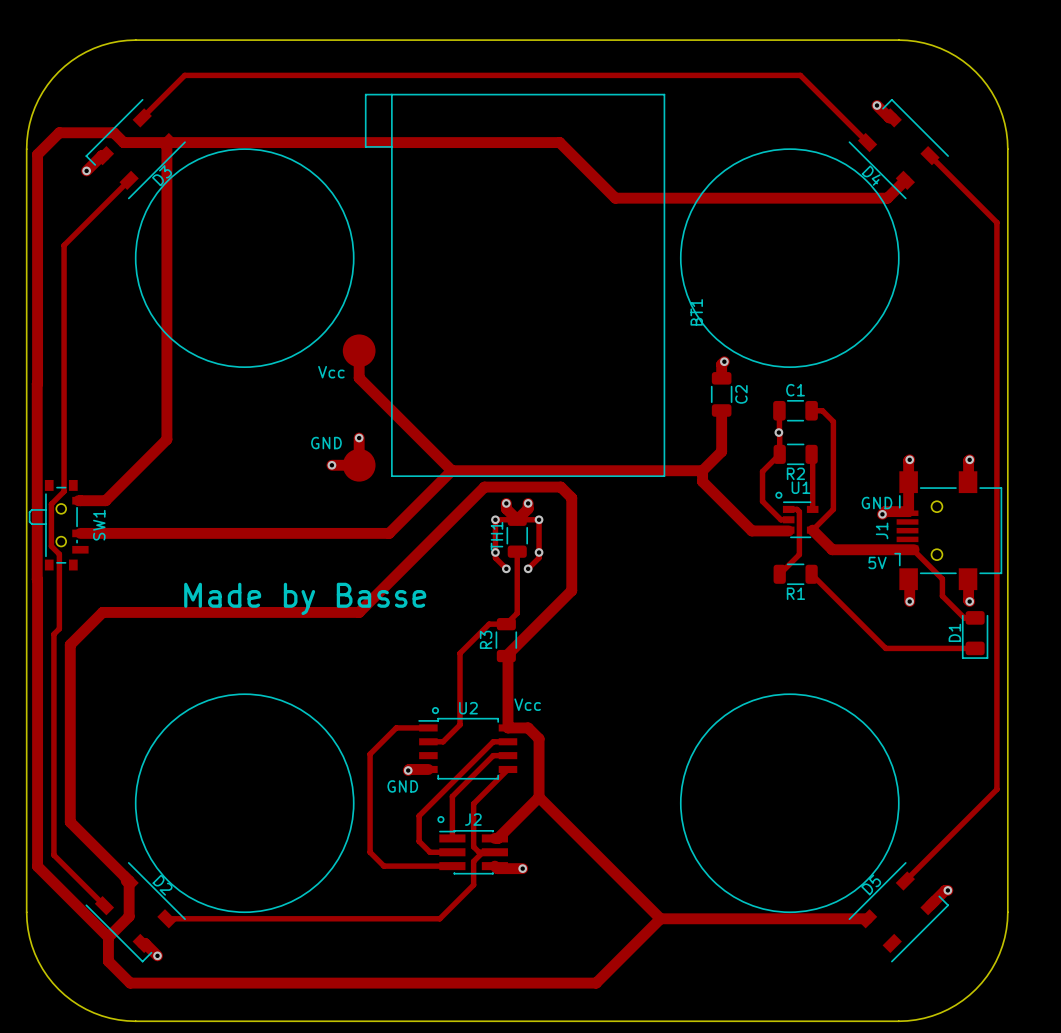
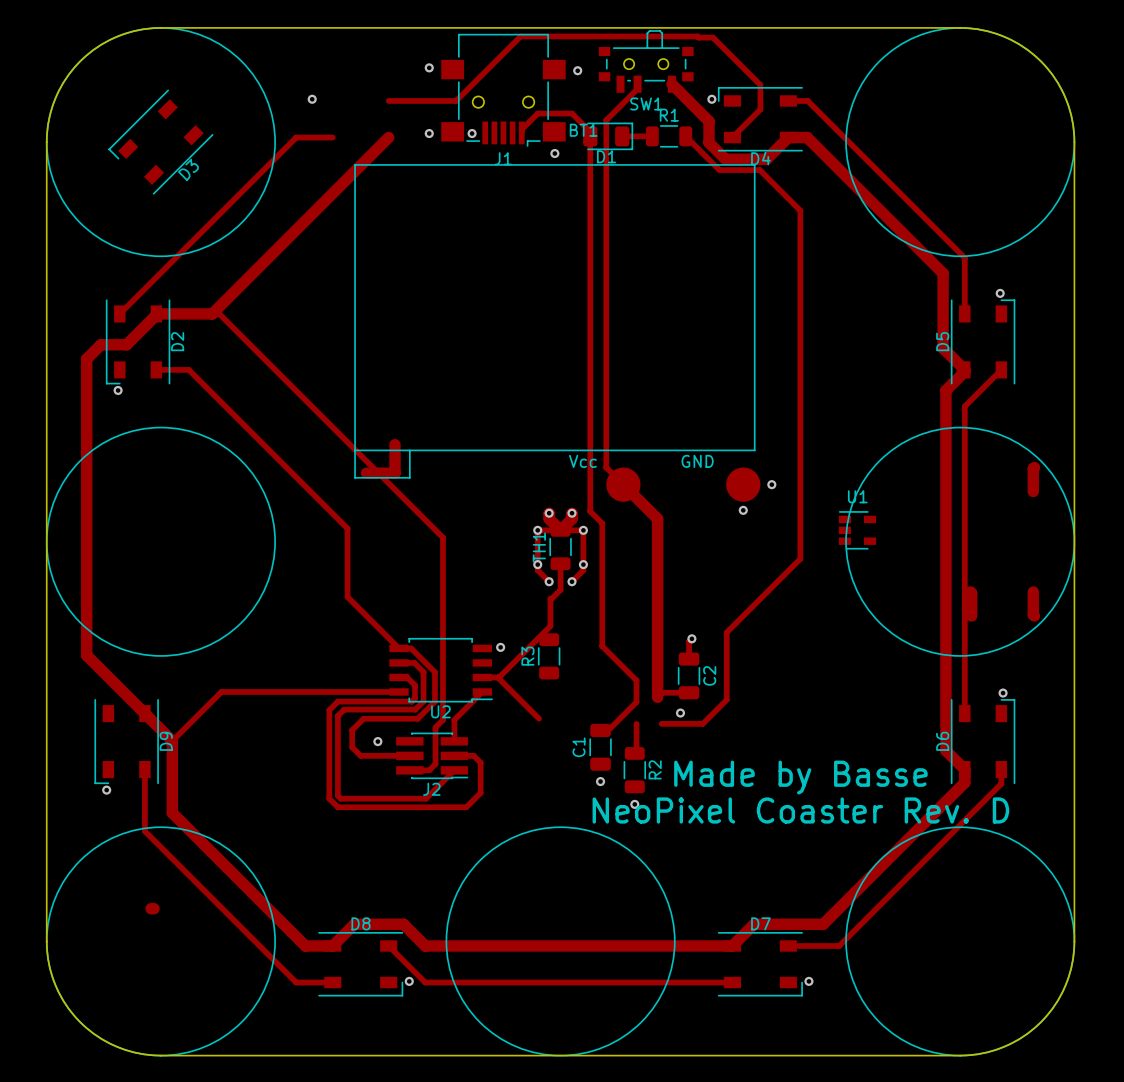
drawing: none -> [46, 27, 276, 257]
drawing: none -> [845, 27, 1076, 257]
via: none -> (429, 67)
via: none -> (577, 70)
track: none -> (637, 84) (637, 88) (606, 120) (606, 467) (657, 518) (657, 697) (662, 692) (689, 692)
track: none -> (671, 84) (709, 121) (709, 142) (725, 159) (766, 159) (788, 137) (807, 137) (943, 273) (943, 348) (964, 369) (945, 390) (945, 750) (964, 769) (964, 782) (823, 924) (754, 924) (732, 945) (425, 945) (403, 924) (354, 924) (332, 945) (305, 945) (172, 812) (172, 741)
track: (877, 105) (889, 117) (892, 117) -> none
via: (877, 105) -> none
via: none -> (312, 99)
via: none -> (711, 99)
track: none -> (388, 100) (456, 100) (520, 36) (713, 37) (760, 84) (760, 109) (732, 137)
track: none -> (788, 100) (807, 100) (964, 257) (964, 313)
track: (142, 117) (184, 75) (800, 75) (867, 142) -> none
via: none -> (429, 133)
via: none -> (472, 133)
track: none -> (521, 132) (521, 129) (537, 113) (571, 113) (590, 131) (590, 511) (602, 523) (602, 646) (636, 680) (636, 702) (608, 730) (600, 730)
track: (166, 142) (166, 439) (105, 500) (78, 500) -> none
track: none -> (622, 136) (652, 136)
track: none -> (685, 136) (719, 170) (759, 170) (800, 210) (800, 558) (726, 632) (726, 699) (702, 723) (661, 723)
track: none -> (332, 137) (296, 137) (119, 313)
track: none -> (388, 137) (212, 313)
drawing: [135, 148, 355, 368] -> none
drawing: [680, 148, 900, 368] -> none
D4 rotation: 0° (898, 149) -> 45° counterclockwise (760, 119)
D4 position: (898, 149) -> (760, 119)
track: (104, 155) (101, 155) (86, 170) -> none
track: (930, 155) (996, 222) (996, 789) (905, 881) -> none
via: none -> (554, 153)
via: (86, 170) -> none
track: (129, 180) (64, 245) (64, 491) (51, 504) (51, 546) (59, 554) (59, 628) (53, 634) (53, 855) (104, 905) -> none
track: (905, 180) (887, 198) (615, 198) (559, 142) (123, 142) (113, 132) (59, 132) (37, 154) (37, 866) (108, 937) -> none
BT1 rotation: 0° (503, 287) -> 90° counterclockwise (557, 333)
via: none -> (1000, 293)
track: none -> (212, 313) (219, 313) (442, 537) (442, 720) (435, 727) (435, 764) (429, 770) (409, 770)
track: none -> (212, 313) (156, 313) (126, 344) (100, 344) (86, 359) (86, 655) (172, 741)
track: (359, 350) (359, 378) (451, 470) -> none
track: (724, 361) (721, 364) (721, 378) -> none
via: (724, 361) -> none
track: none -> (156, 369) (188, 369) (347, 528) (347, 597) (399, 648) (411, 648) (434, 672) (434, 701) (417, 718) (363, 718) (352, 730) (352, 747) (360, 755) (409, 755)
track: none -> (1001, 369) (964, 406) (964, 713)
text: Vcc (331, 372) -> none
via: none -> (118, 390)
C1 name position: C1 (795, 390) -> C1 (578, 747)
C2 position: (721, 394) -> (689, 675)
track: (721, 410) (721, 451) (702, 470) -> none
track: (779, 410) (779, 454) (762, 471) (762, 501) (780, 519) (788, 519) -> none
C1 rotation: 0° (795, 410) -> 90° clockwise (600, 747)
C1 position: (795, 410) -> (600, 747)
track: (811, 410) (822, 410) (833, 421) (833, 509) (812, 530) (832, 549) (914, 549) -> none
drawing: none -> [46, 426, 276, 657]
drawing: none -> [845, 426, 1076, 657]
via: (778, 432) -> none
via: (359, 438) -> none
text: GND (326, 443) -> none
text: none -> Vcc (582, 461)
text: none -> GND (697, 461)
R2 rotation: 0° (795, 454) -> 90° clockwise (634, 770)
R2 position: (795, 454) -> (634, 770)
track: (811, 454) (812, 509) -> none
track: (909, 459) (908, 511) (885, 511) (882, 514) -> none
via: (909, 459) -> none
via: (969, 459) -> none
via: (331, 465) -> none
track: (451, 470) (702, 470) -> none
track: (451, 470) (389, 533) (80, 533) -> none
track: (702, 470) (702, 481) (751, 530) (788, 530) -> none
R2 name position: R2 (795, 473) -> R2 (655, 769)
via: none -> (771, 484)
drawing: [775, 491, 783, 499] -> none
via: none -> (743, 510)
text: GND (877, 503) -> none
track: (788, 509) (797, 509) (799, 511) (799, 554) (779, 574) -> none
via: (882, 514) -> none
SW1 rotation: 0° (58, 525) -> 90° clockwise (646, 61)
SW1 position: (58, 525) -> (646, 61)
J1 rotation: 0° (948, 530) -> 90° counterclockwise (503, 90)
J1 position: (948, 530) -> (503, 90)
track: (908, 548) (911, 548) (942, 579) (942, 596) (964, 617) (975, 617) -> none
text: 5V (877, 562) -> none
R1 position: (795, 574) -> (669, 136)
track: (811, 574) (885, 648) (975, 648) -> none
track: (517, 576) (517, 613) (506, 624) (489, 624) (460, 653) (460, 724) (443, 741) (428, 741) -> (560, 589) (550, 598) (550, 626) (499, 677) (482, 677)
R1 name position: R1 (795, 593) -> R1 (669, 115)
text: Made by Basse (305, 598) -> none
via: (909, 601) -> none
via: (969, 601) -> none
track: none -> (691, 638) (689, 641) (689, 659)
via: none -> (691, 638)
via: none -> (500, 647)
D1 rotation: 0° (975, 634) -> 90° counterclockwise (608, 136)
D1 position: (975, 634) -> (608, 136)
track: none -> (399, 662) (414, 662) (423, 672) (423, 701) (415, 709) (344, 709) (337, 715) (337, 795) (340, 798) (426, 798) (454, 770)
track: none -> (399, 677) (407, 677) (414, 685) (414, 698) (412, 701) (337, 701) (329, 710) (329, 798) (337, 807) (466, 807) (480, 792) (480, 762) (473, 755) (454, 755)
track: none -> (497, 677) (539, 718)
track: none -> (399, 691) (221, 691) (172, 741)
track: none -> (482, 691) (454, 719) (454, 741)
via: none -> (1003, 693)
drawing: [135, 693, 355, 913] -> none
drawing: [680, 693, 900, 913] -> none
via: none -> (680, 713)
text: Vcc (527, 704) -> none
track: none -> (636, 723) (636, 751) (634, 753)
drawing: [432, 707, 439, 714] -> none
D9: none -> (126, 741)
via: none -> (377, 741)
D6: none -> (983, 741)
track: (428, 727) (396, 727) (370, 754) (370, 852) (383, 866) (452, 866) -> none
track: (507, 741) (493, 741) (419, 815) (419, 841) (430, 852) (452, 852) -> none
track: none -> (144, 769) (144, 831) (296, 982) (332, 982)
U2 rotation: 0° (467, 748) -> 180° (441, 670)
U2 position: (467, 748) -> (441, 670)
track: none -> (1001, 769) (1001, 783) (839, 945) (788, 945)
track: (507, 755) (493, 755) (452, 796) (452, 838) -> none
text: none -> Made by Basse (800, 777)
via: none -> (600, 781)
via: none -> (106, 790)
track: (428, 769) (408, 770) -> none
track: (507, 769) (473, 803) (473, 846) (479, 852) (494, 852) -> none
via: (408, 770) -> none
via: none -> (634, 804)
text: GND (402, 786) -> none
text: none -> NeoPixel Coaster Rev. D (800, 810)
track: (539, 797) (497, 838) (494, 838) -> none
track: (539, 797) (539, 738) (528, 727) (507, 727) (507, 657) (506, 656) (571, 590) (571, 497) (560, 487) (484, 487) (359, 612) (102, 612) (70, 644) (70, 822) (129, 881) (129, 916) (108, 937) -> none
track: (539, 797) (660, 918) -> none
drawing: none -> [46, 826, 276, 1057]
drawing: none -> [445, 826, 676, 1057]
drawing: none -> [845, 826, 1076, 1057]
drawing: [437, 816, 445, 823] -> none
J2 rotation: 0° (473, 852) -> 180° (432, 755)
J2 position: (473, 852) -> (432, 755)
track: (482, 852) (473, 861) (473, 884) (439, 918) (166, 918) -> none
track: (494, 866) (497, 868) (522, 868) -> none
via: (522, 868) -> none
track: (947, 890) (945, 890) (930, 905) -> none
via: (947, 890) -> none
D2 rotation: 0° (135, 912) -> 45° clockwise (138, 341)
D2 position: (135, 912) -> (138, 341)
D5 rotation: 0° (898, 912) -> 45° counterclockwise (983, 341)
D5 position: (898, 912) -> (983, 341)
track: none -> (388, 945) (425, 982) (732, 982)
track: (660, 918) (867, 918) -> none
track: (660, 918) (596, 983) (130, 983) (108, 961) (108, 937) -> none
D8: none -> (360, 964)
D7: none -> (760, 964)
track: (142, 943) (145, 943) (157, 955) -> none
via: none -> (409, 981)
via: none -> (808, 981)
via: (157, 955) -> none

